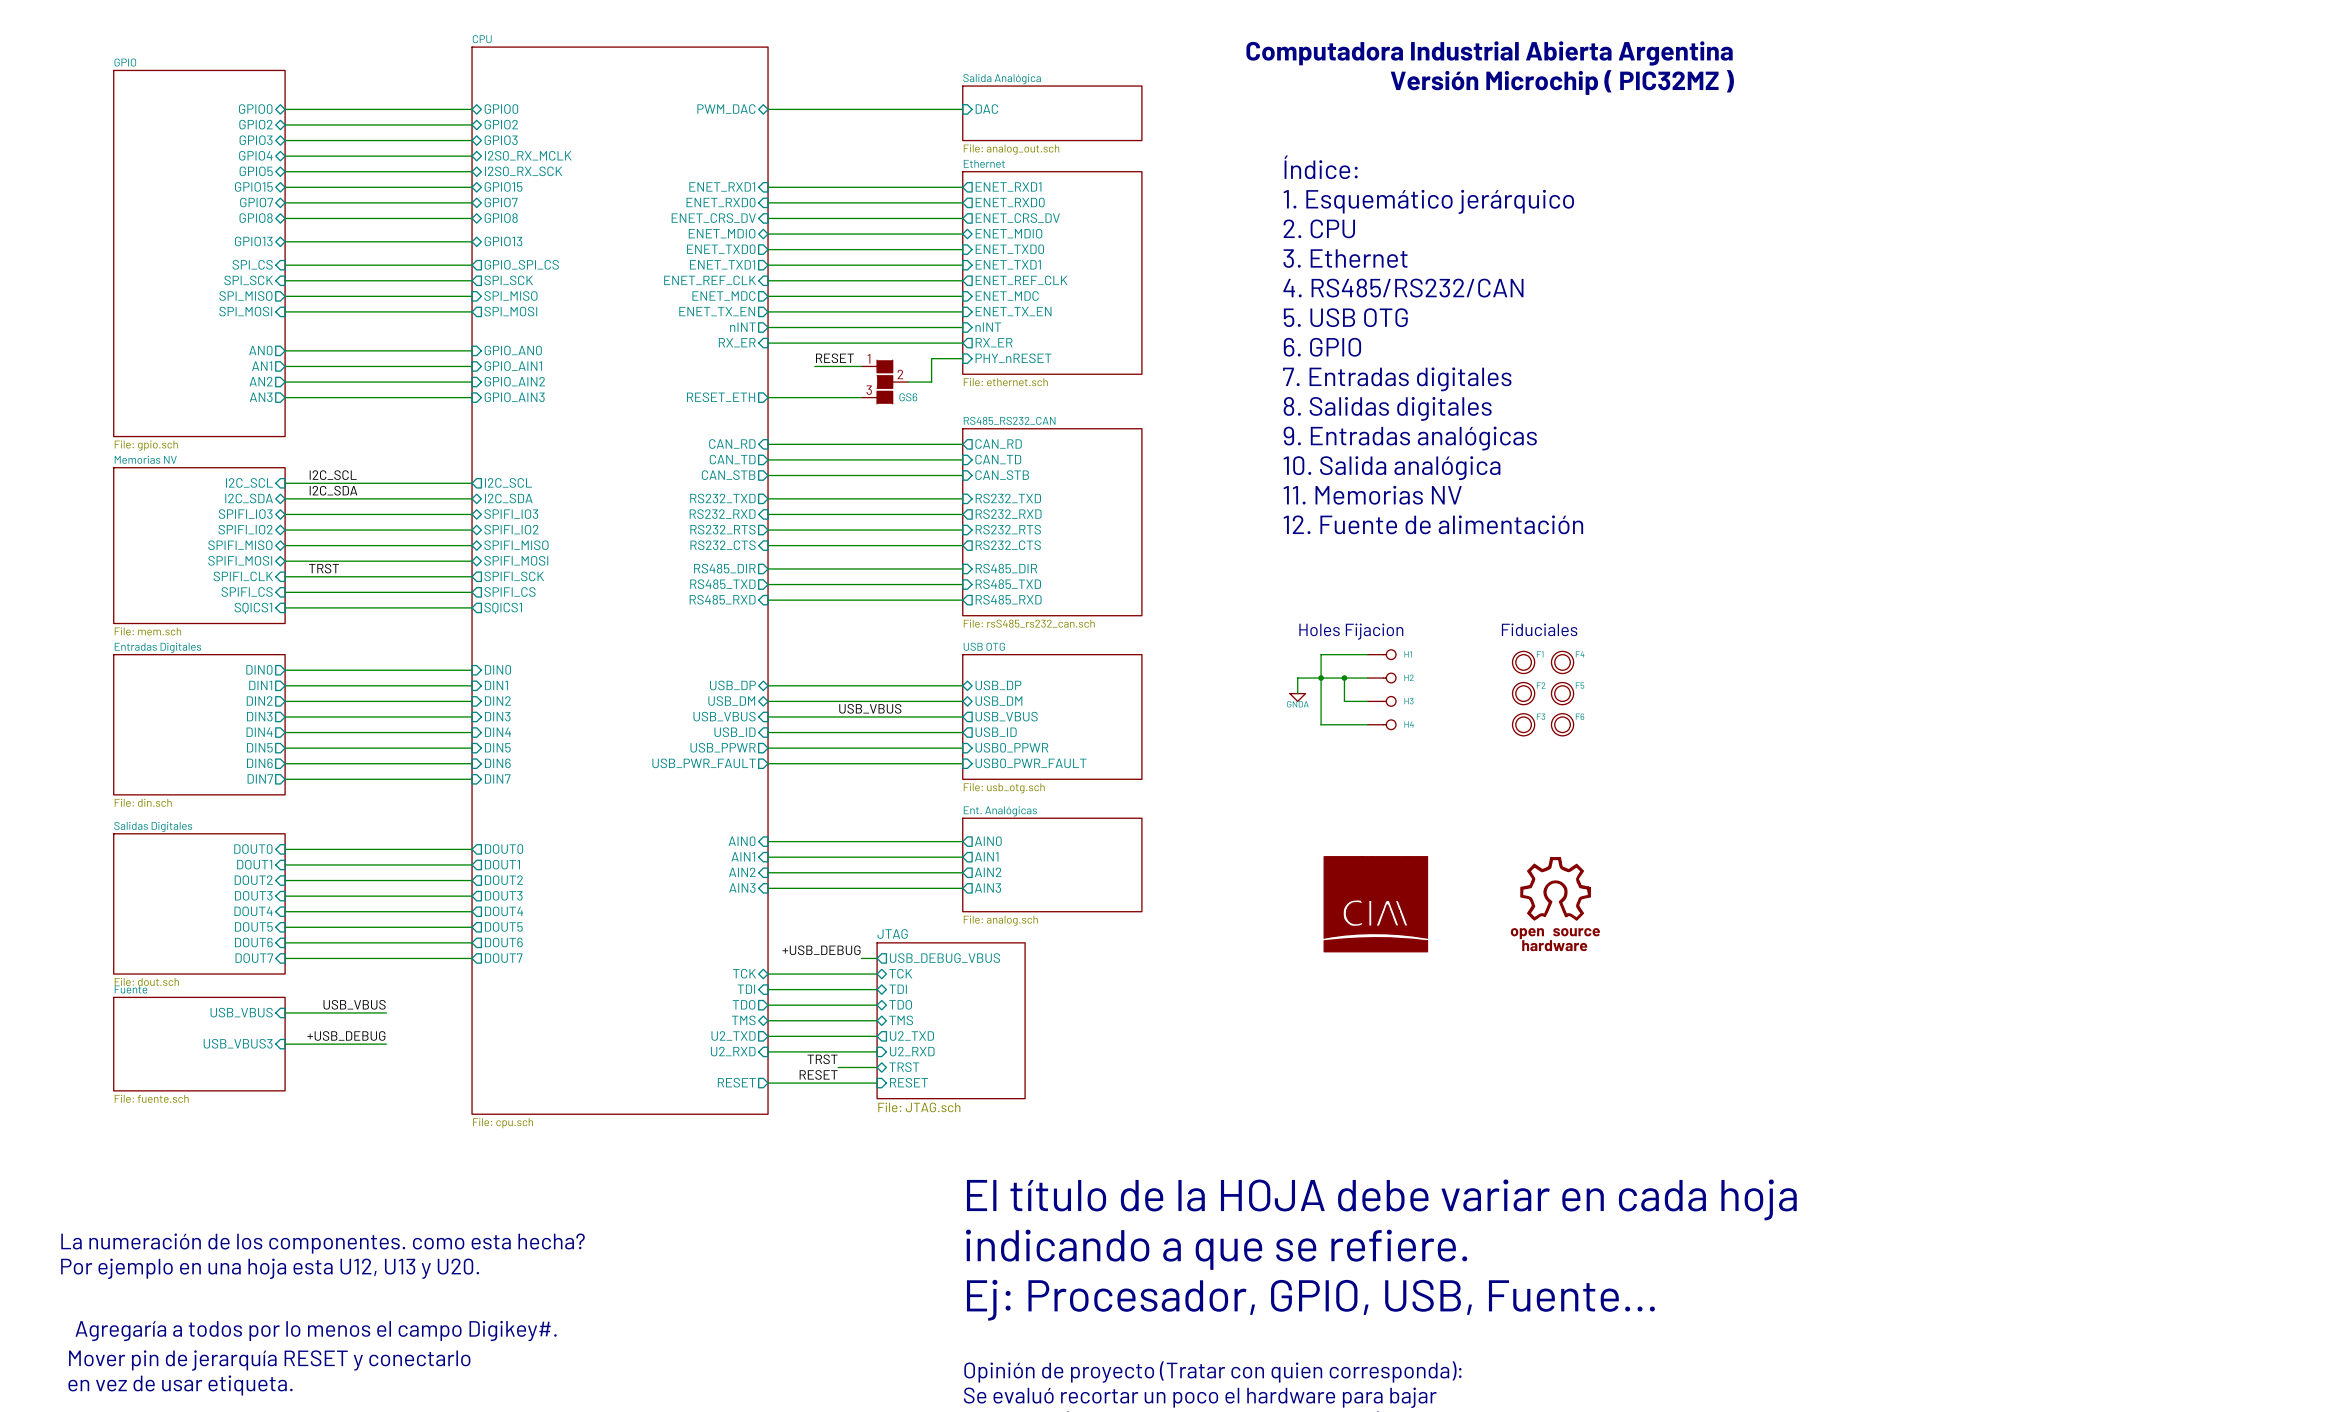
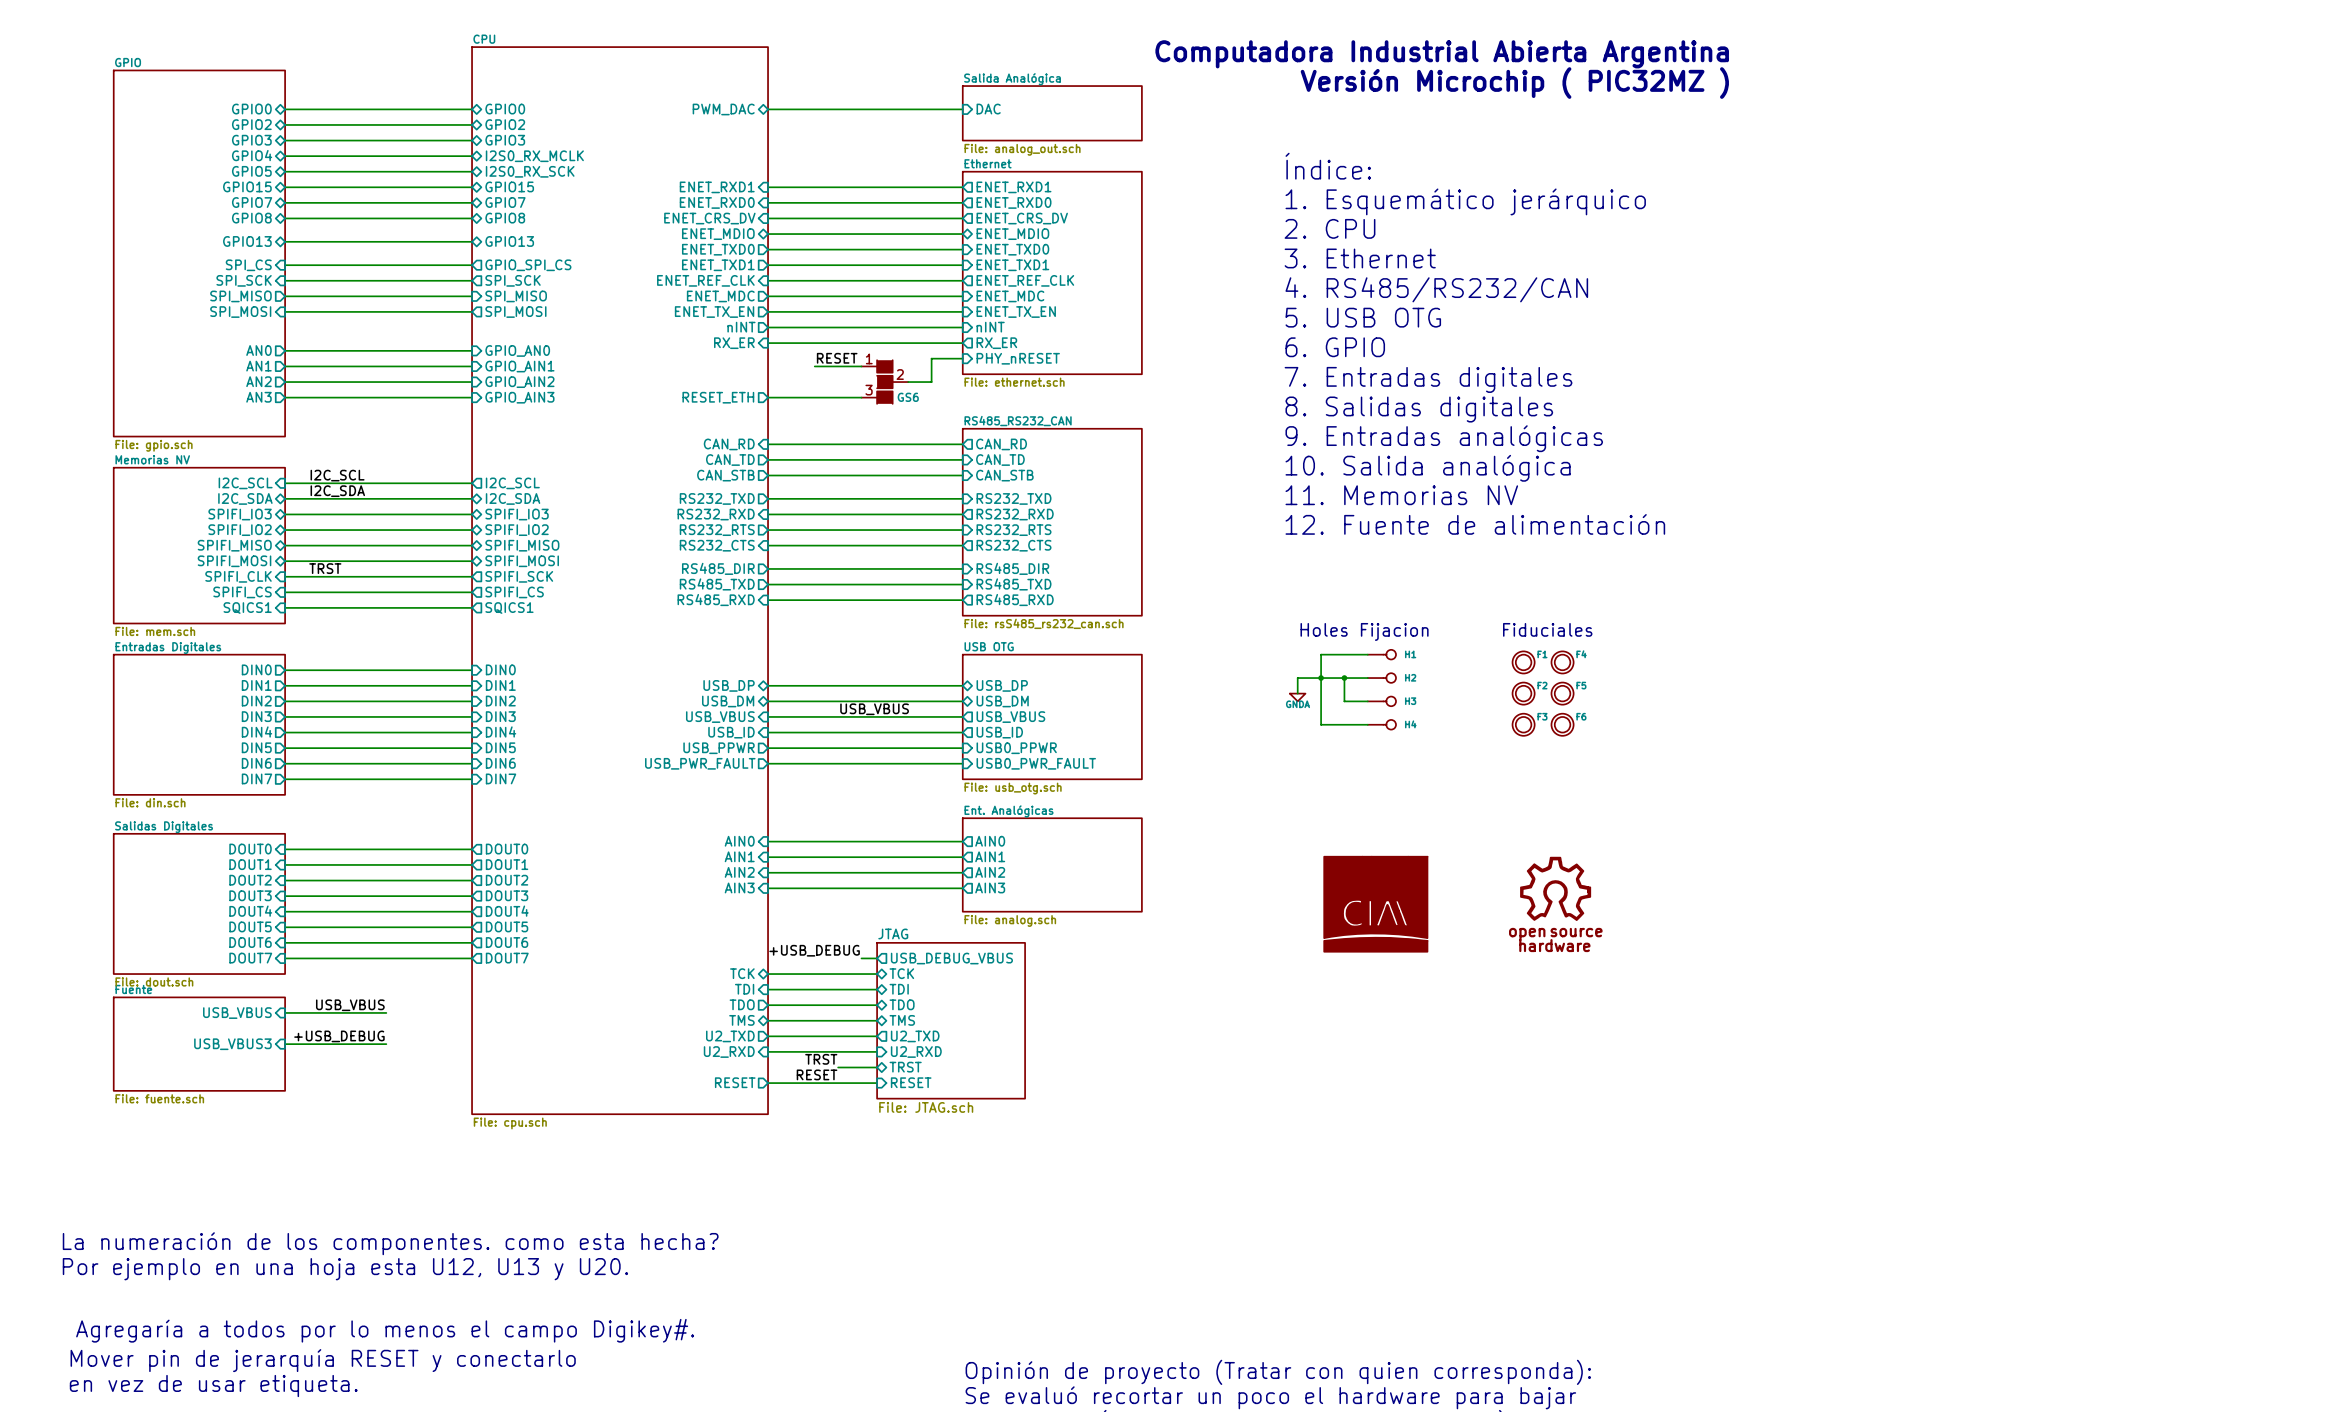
text: El título de la HOJA debe variar en cada hoja (1381, 1199) -> none
text: indicando a que se refiere. (1216, 1249) -> none
text: Ej: Procesador, GPIO, USB, Fuente... (1310, 1300) -> none

